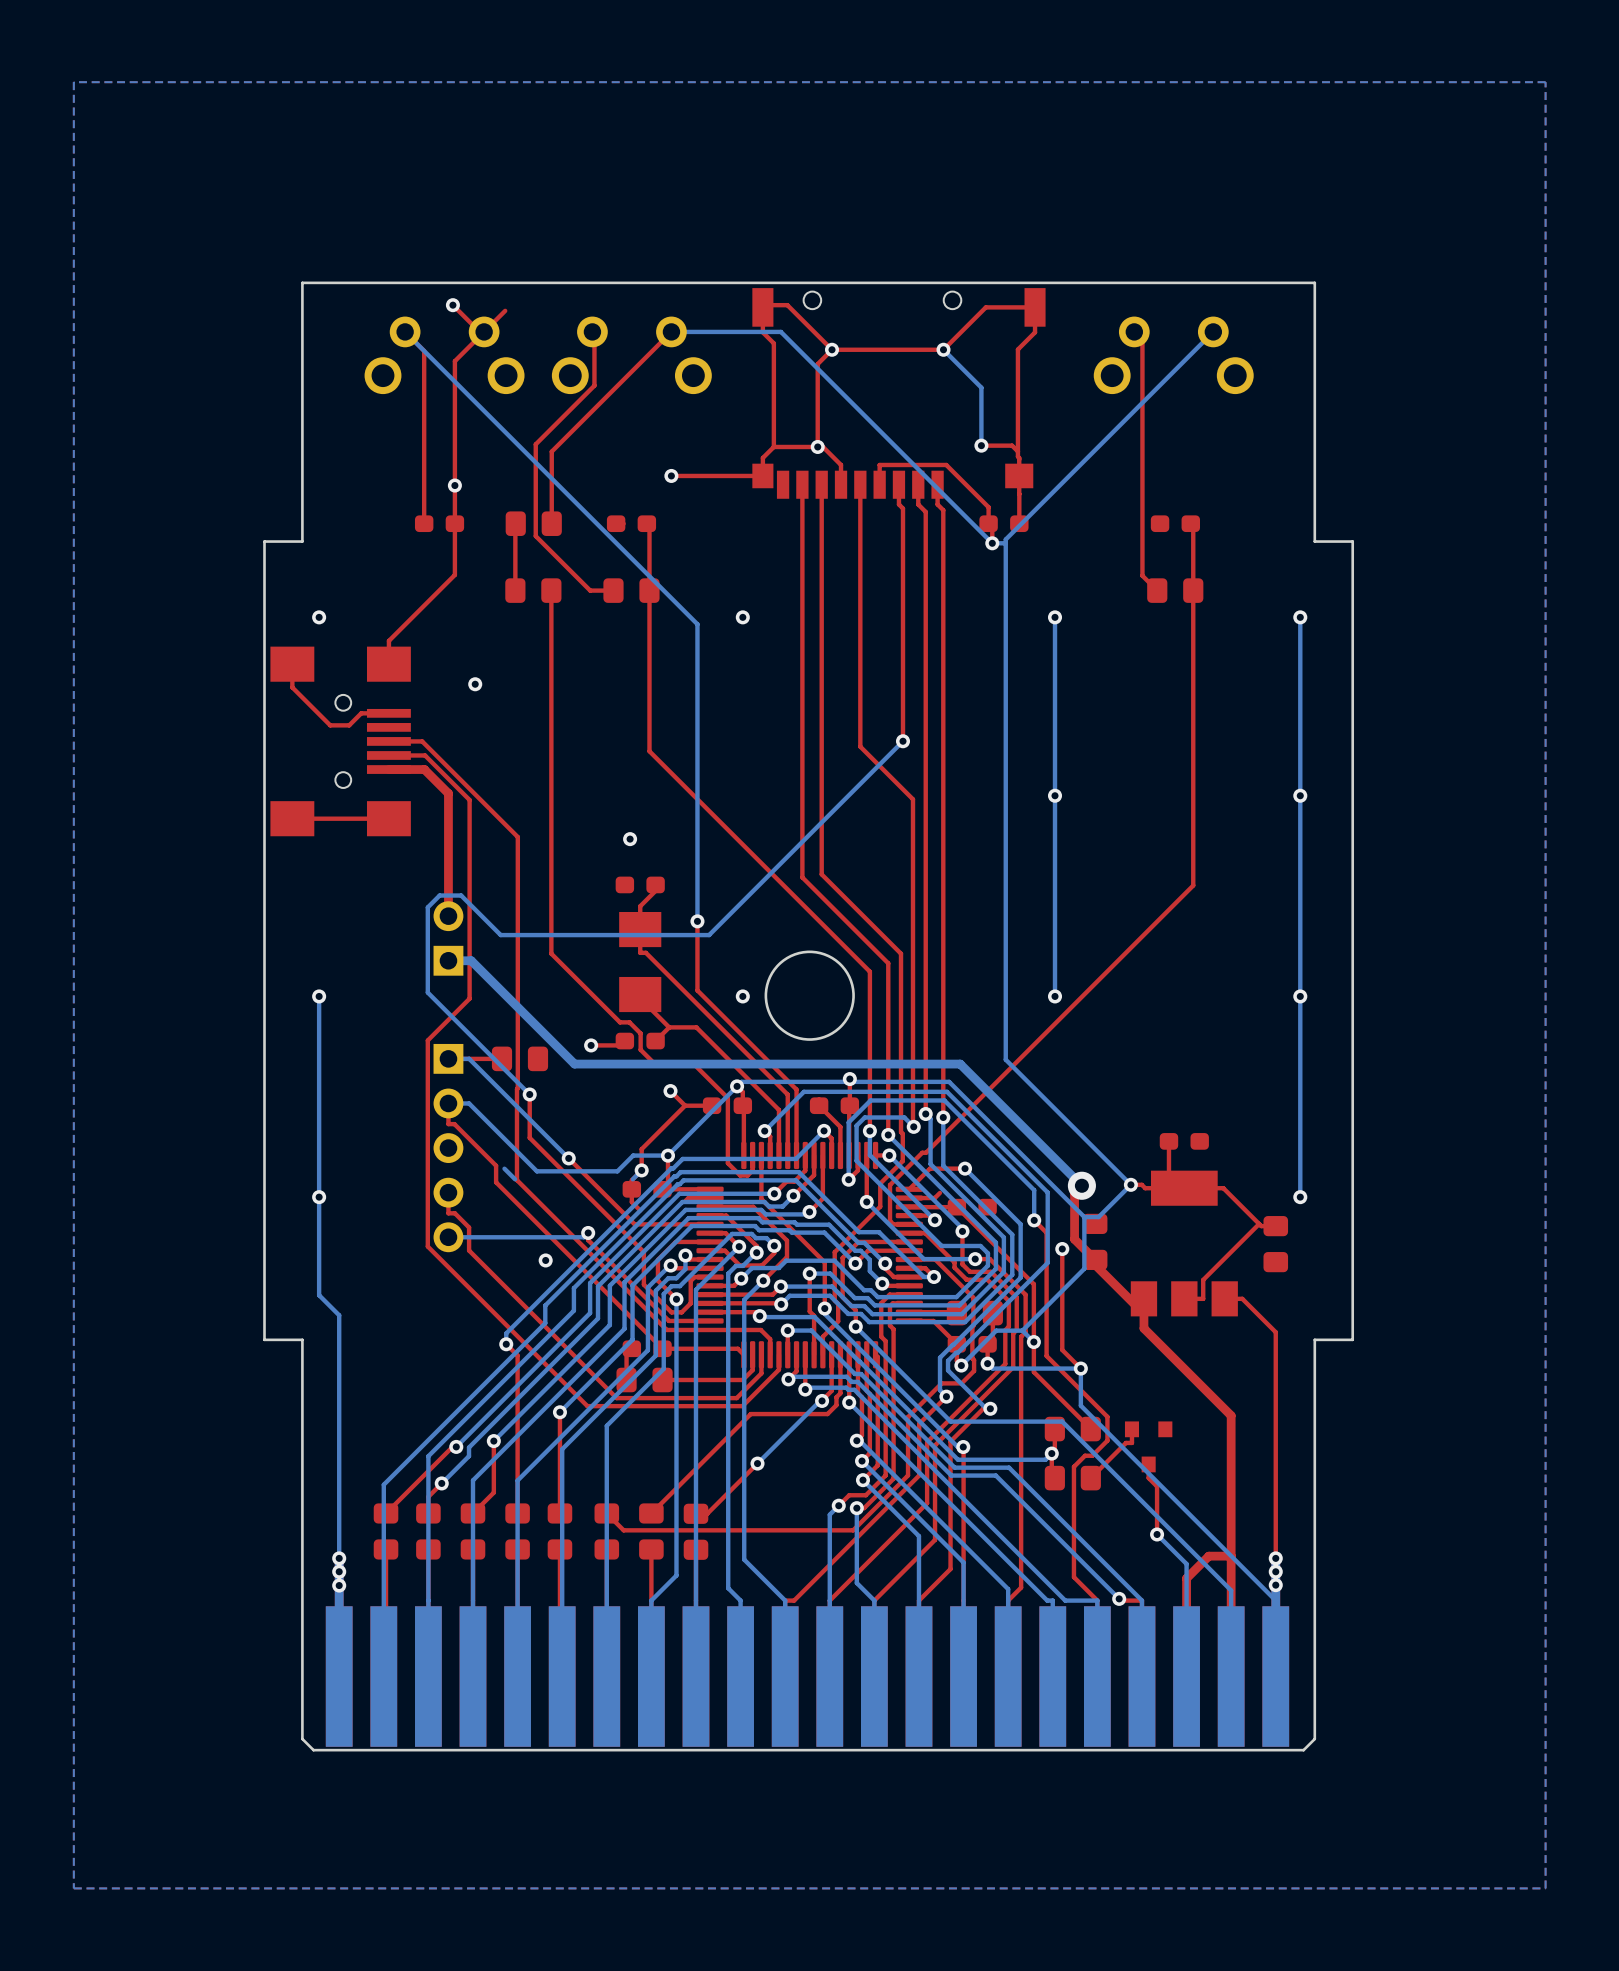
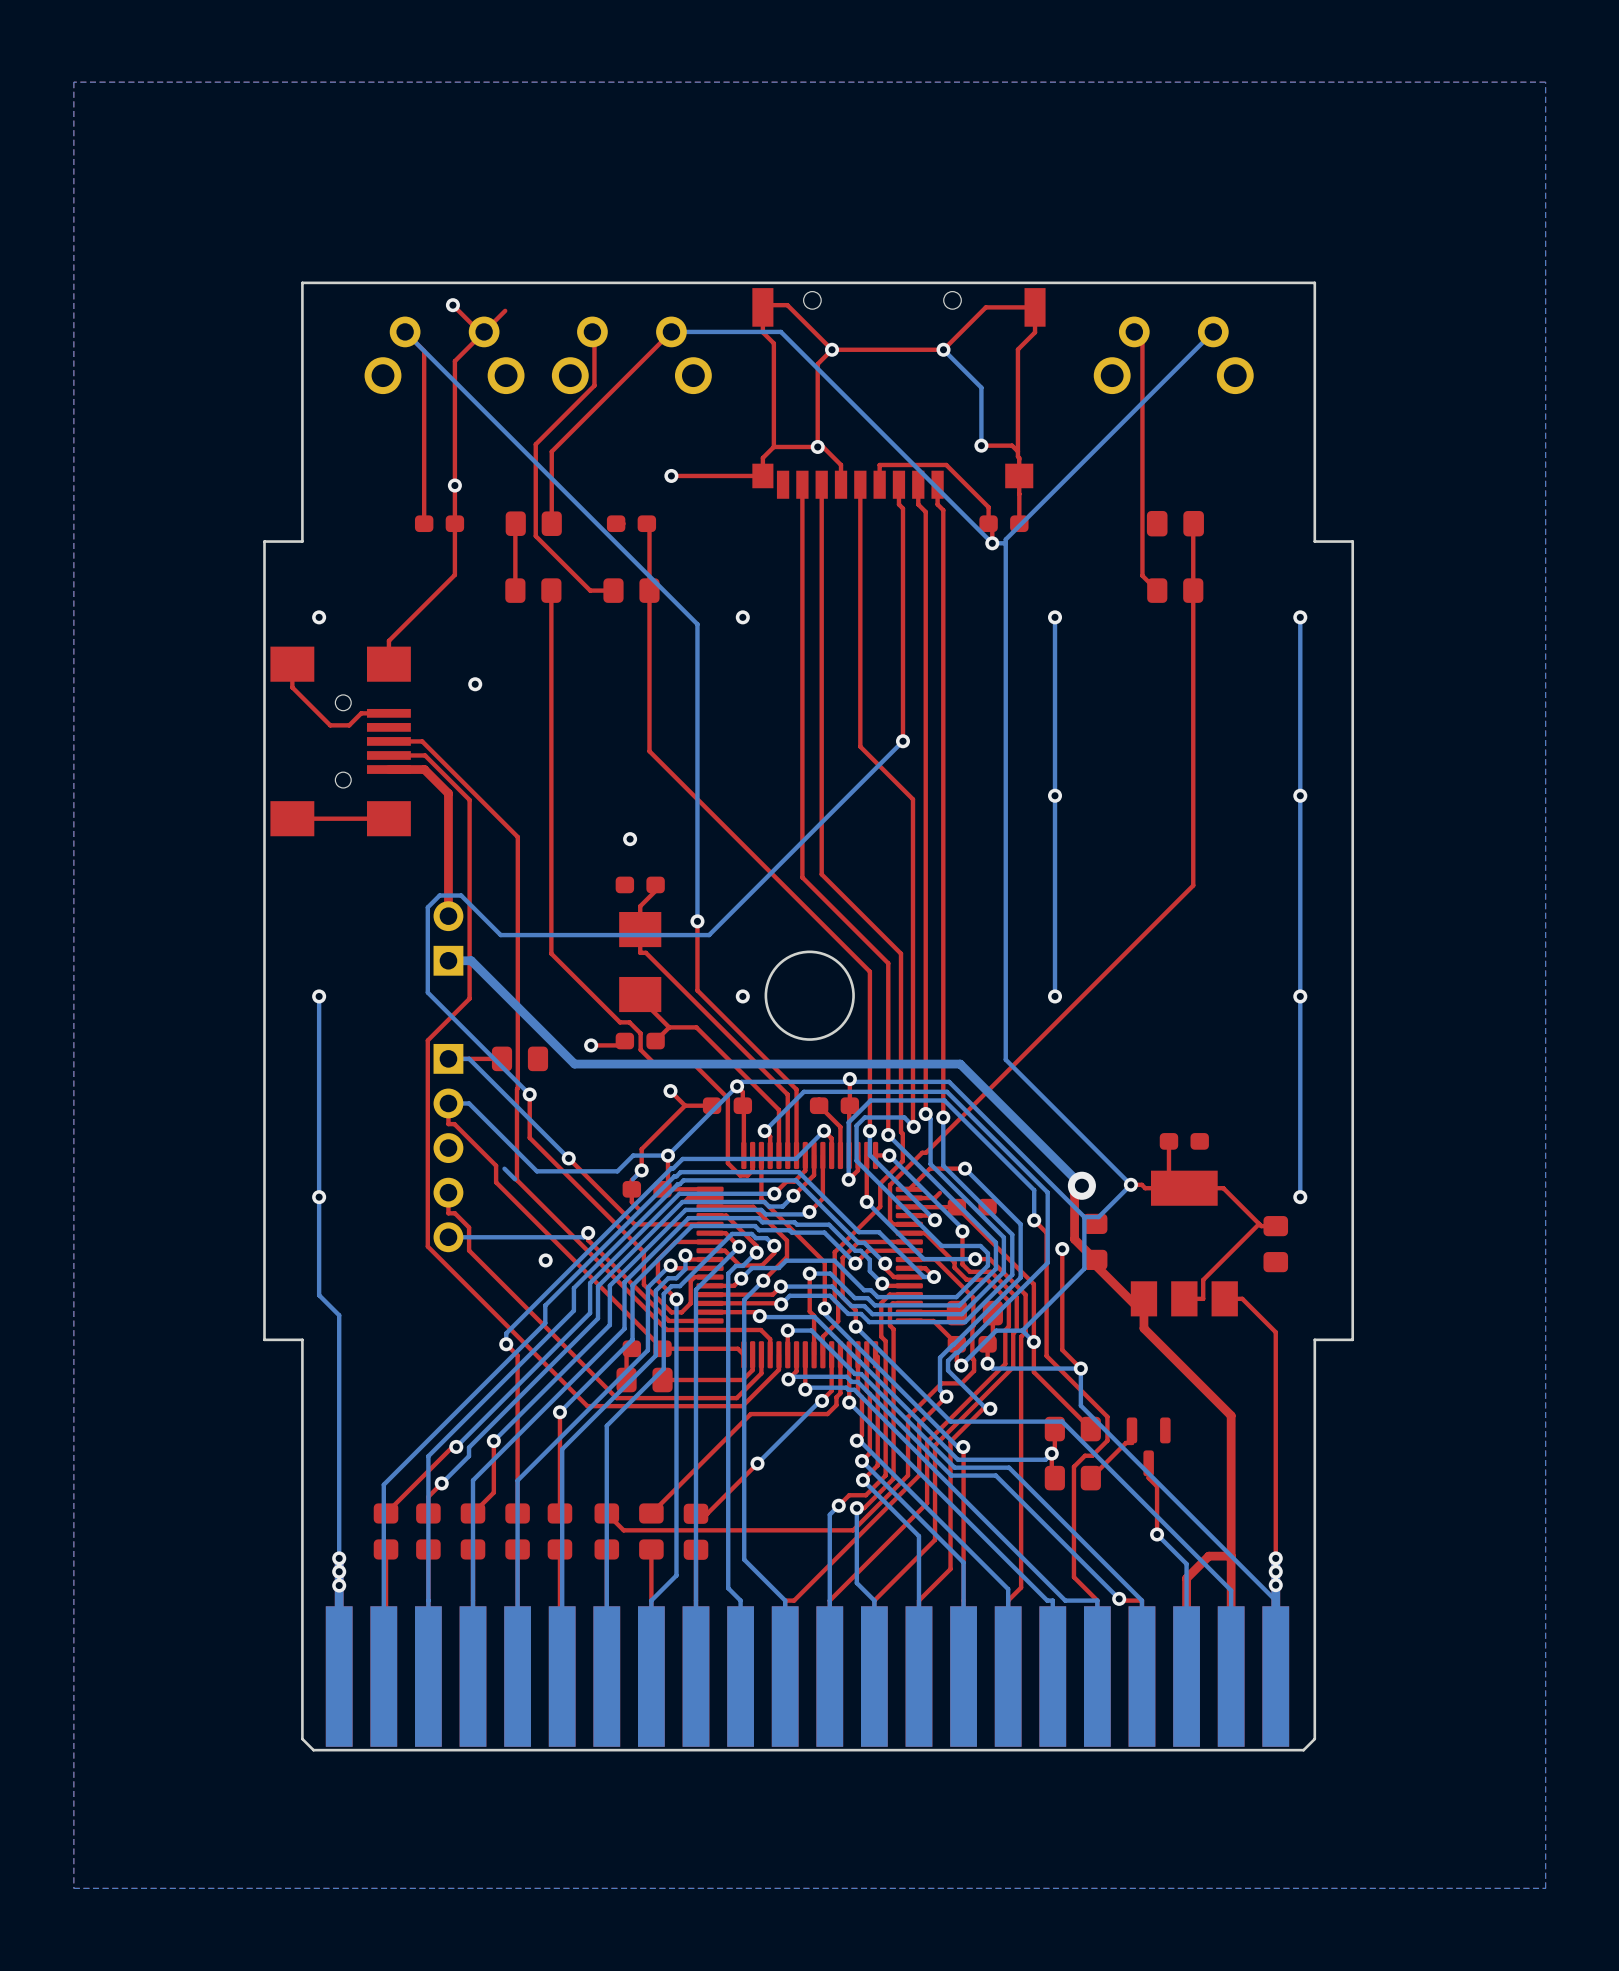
part footprint: [1150, 515, 1201, 533] -> [1146, 510, 1204, 537]
part footprint: [1124, 1421, 1173, 1473] -> [1126, 1417, 1171, 1477]

